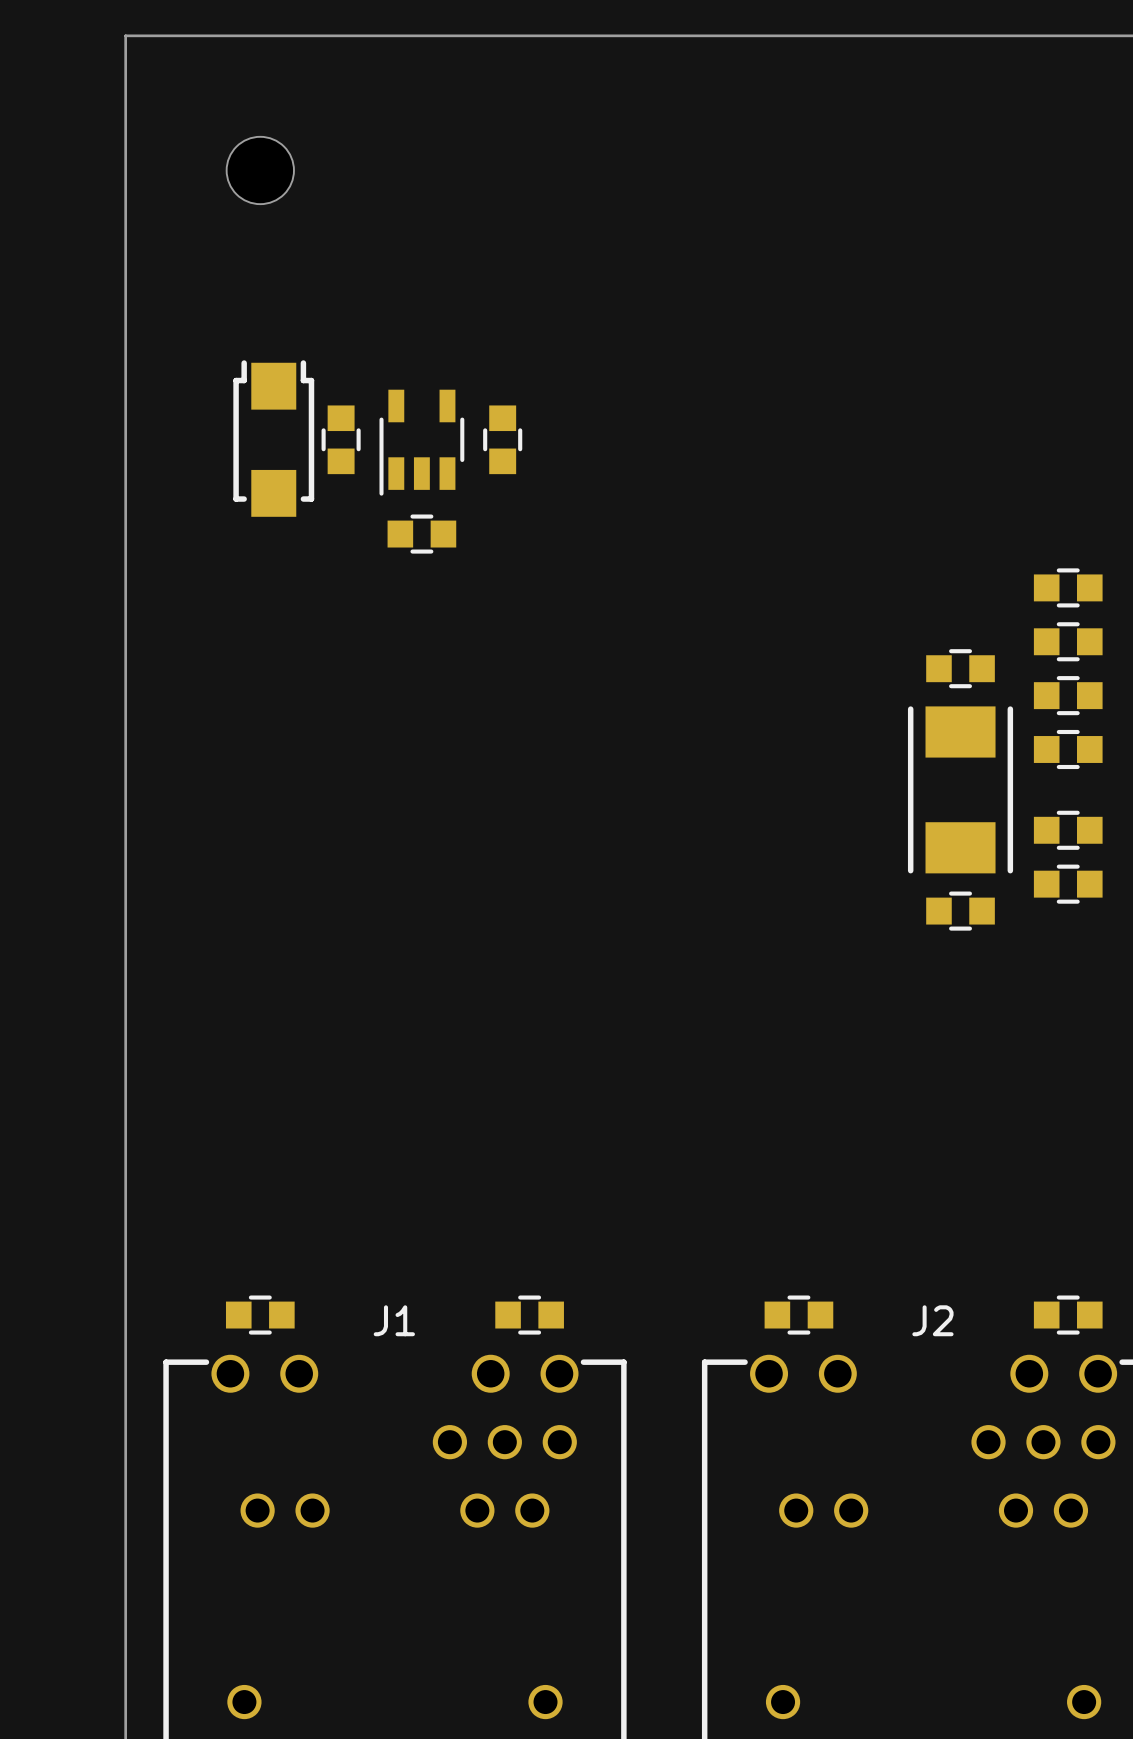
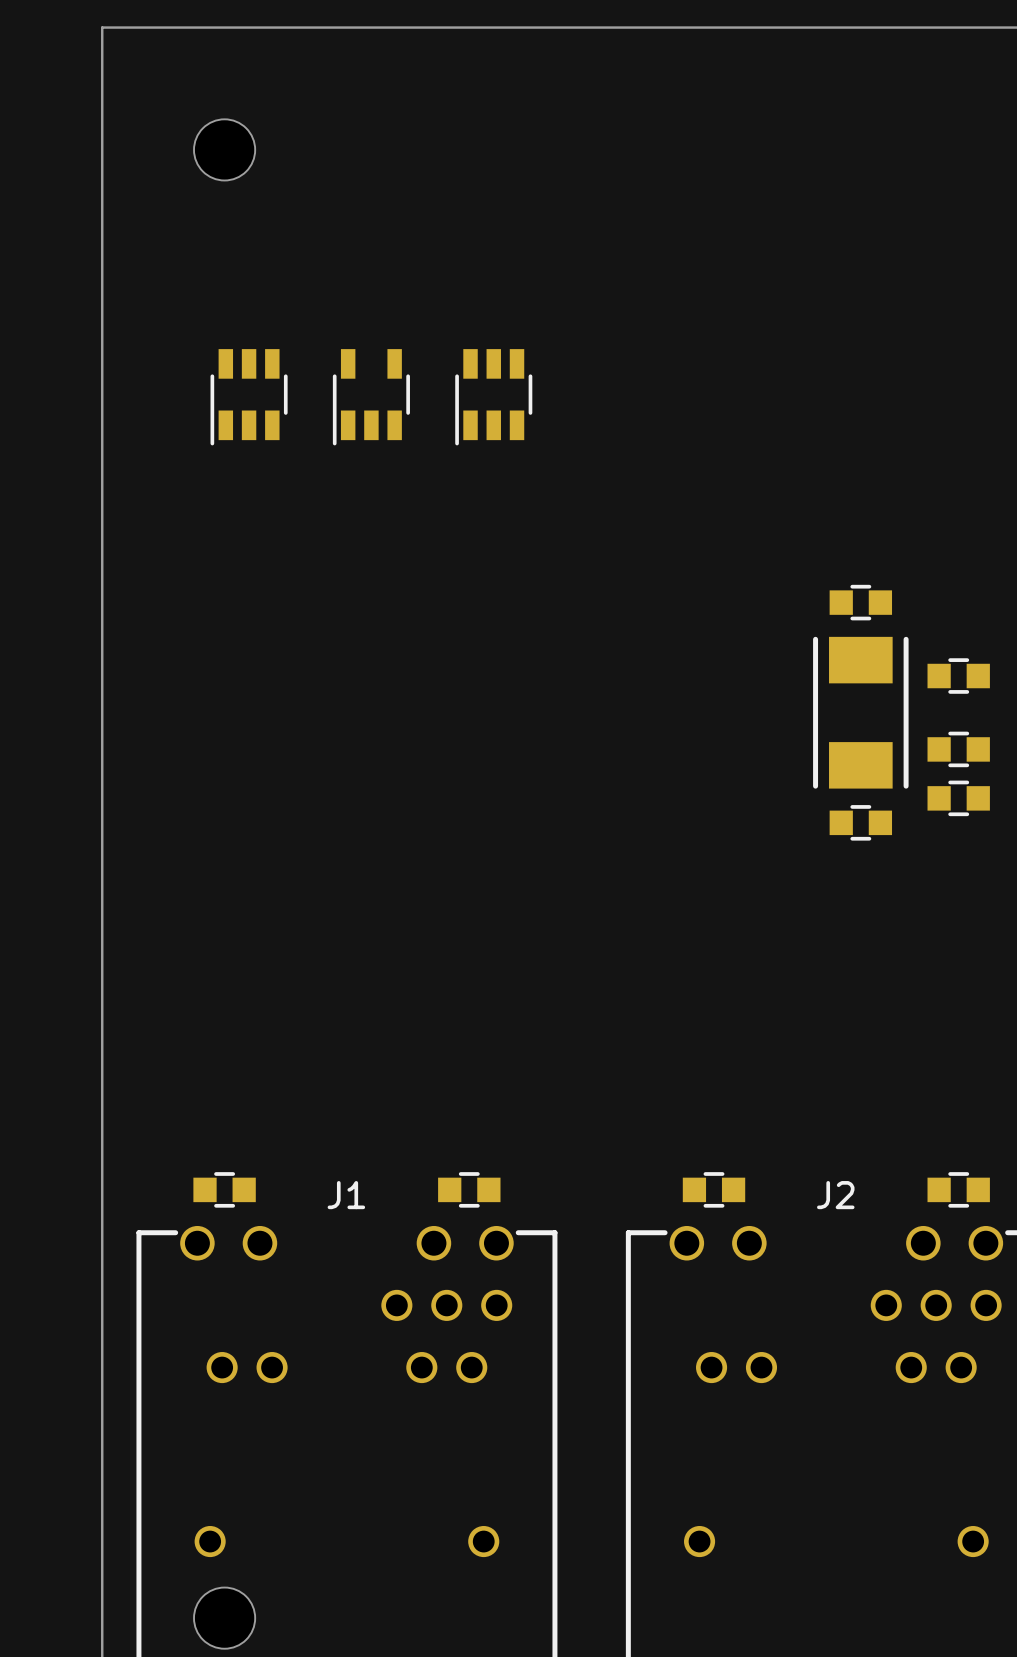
part footprint: [233, 360, 315, 517] -> [210, 349, 288, 446]
part: (341, 439) -> none
part: (502, 439) -> none
part: none -> (493, 397)
part: (421, 534) -> none
part: (1068, 587) -> none
part: (1068, 641) -> none
part: (1068, 695) -> none

